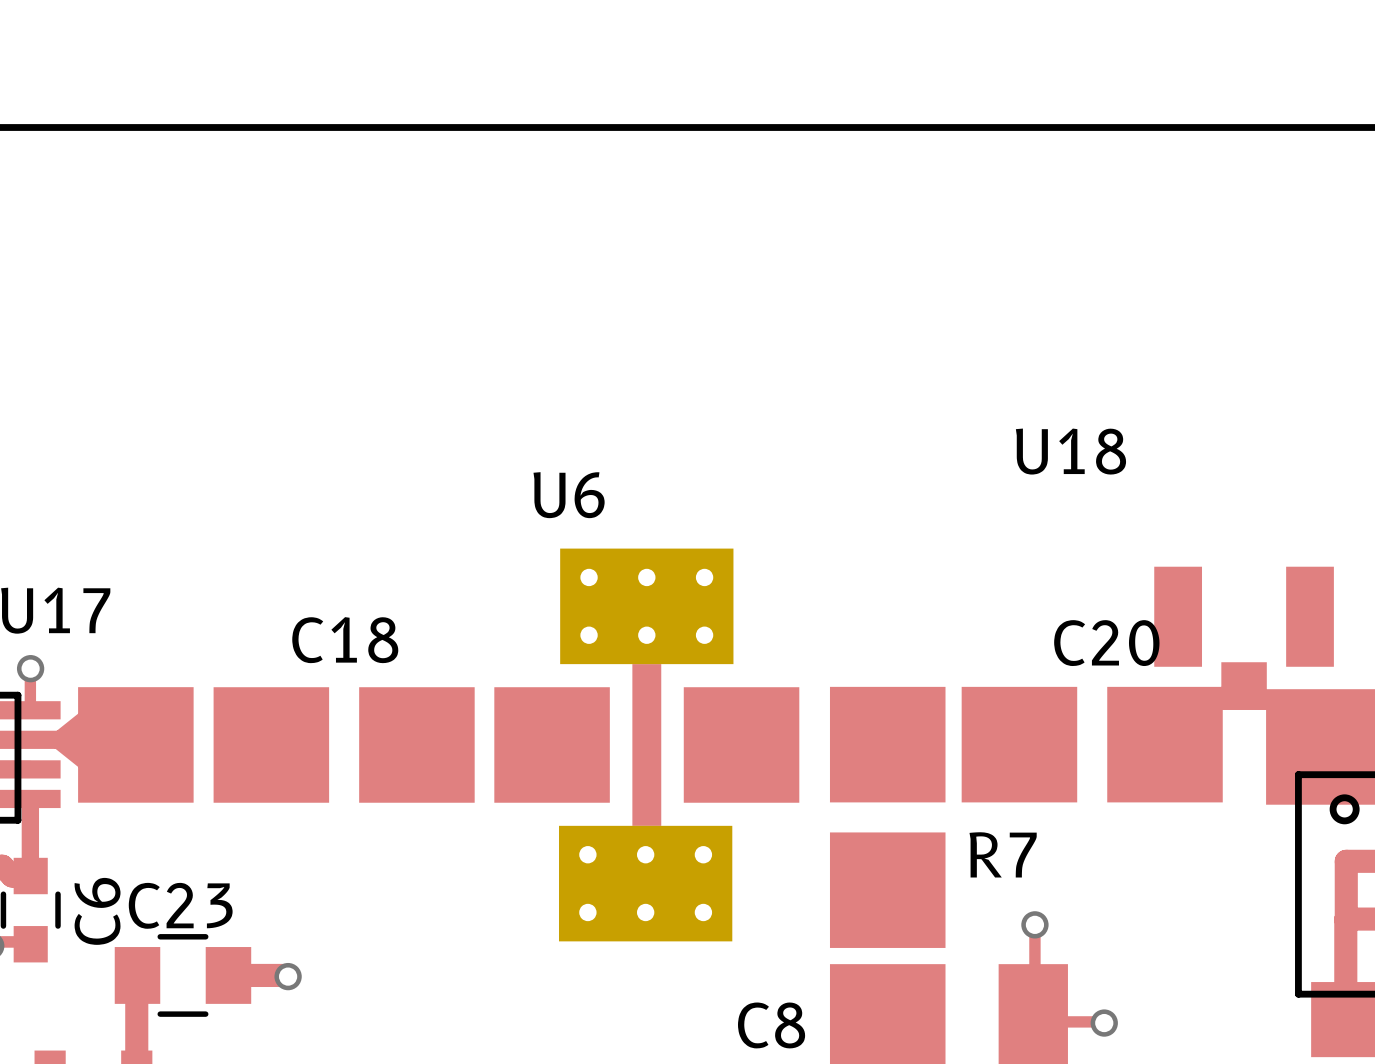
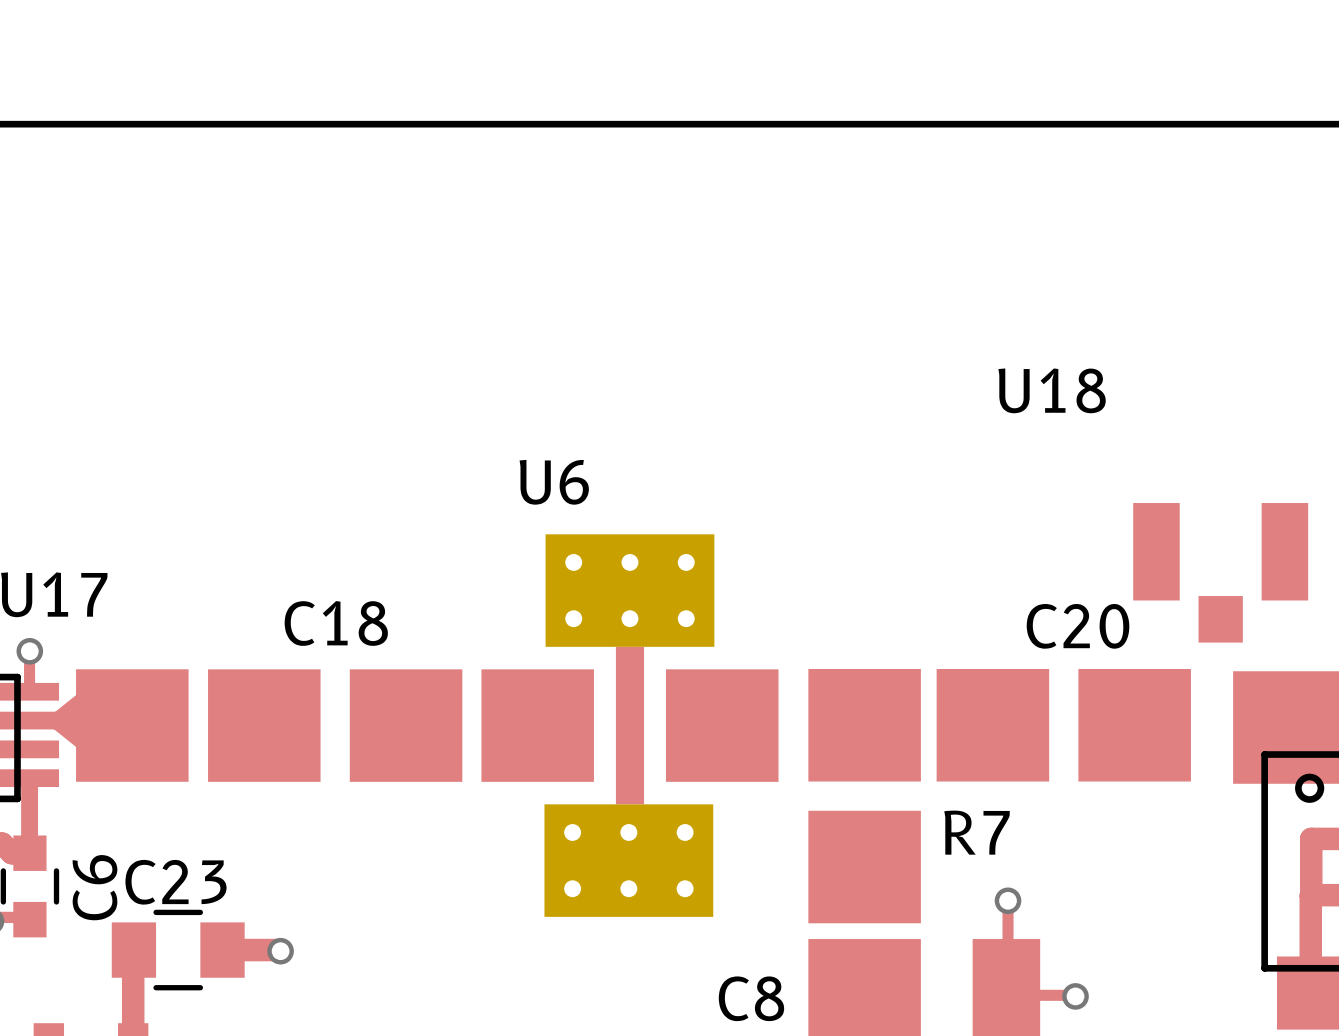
U18 position: (1244, 638) -> (1220, 572)

